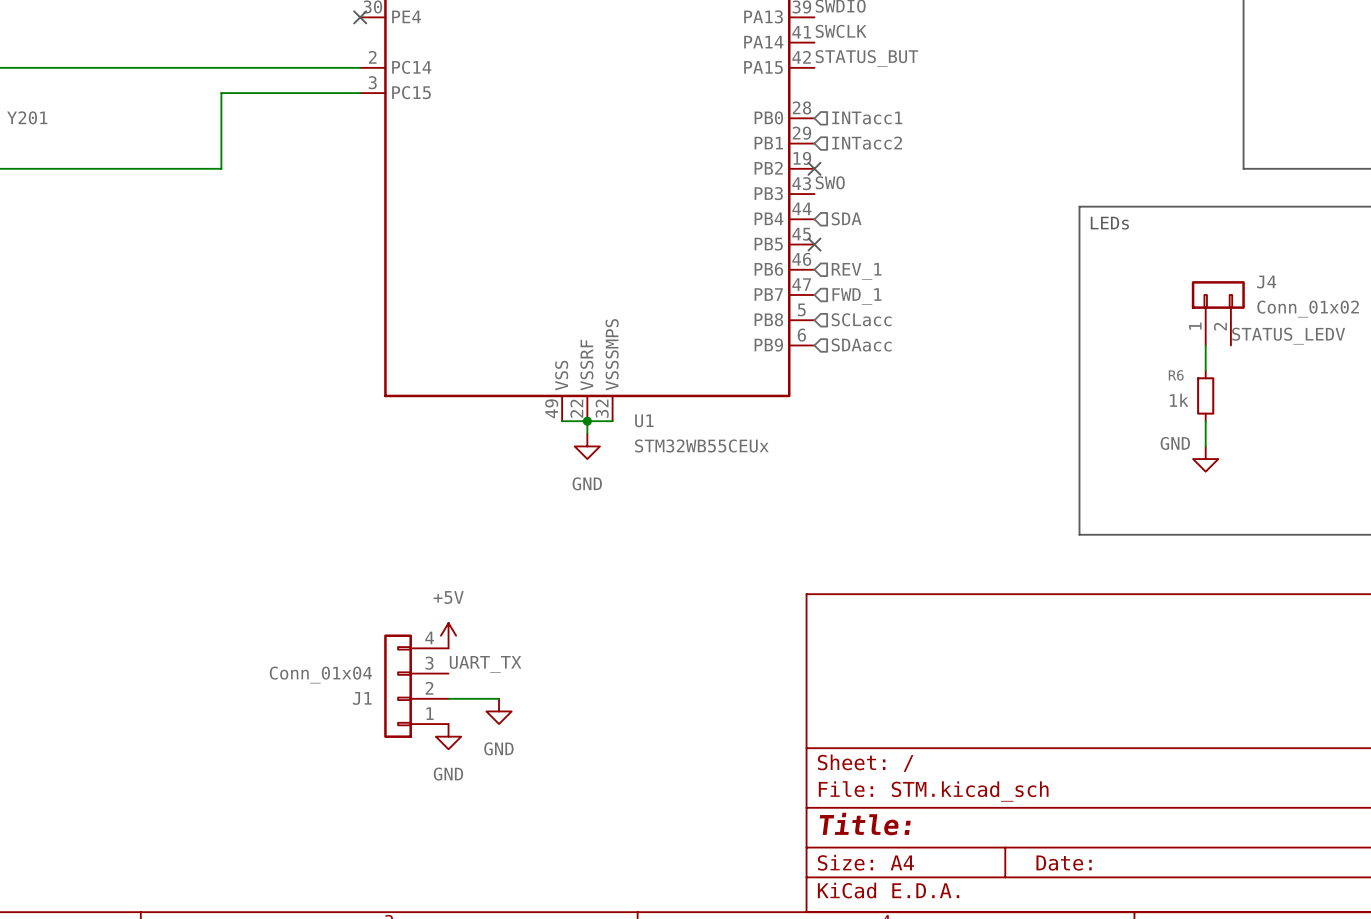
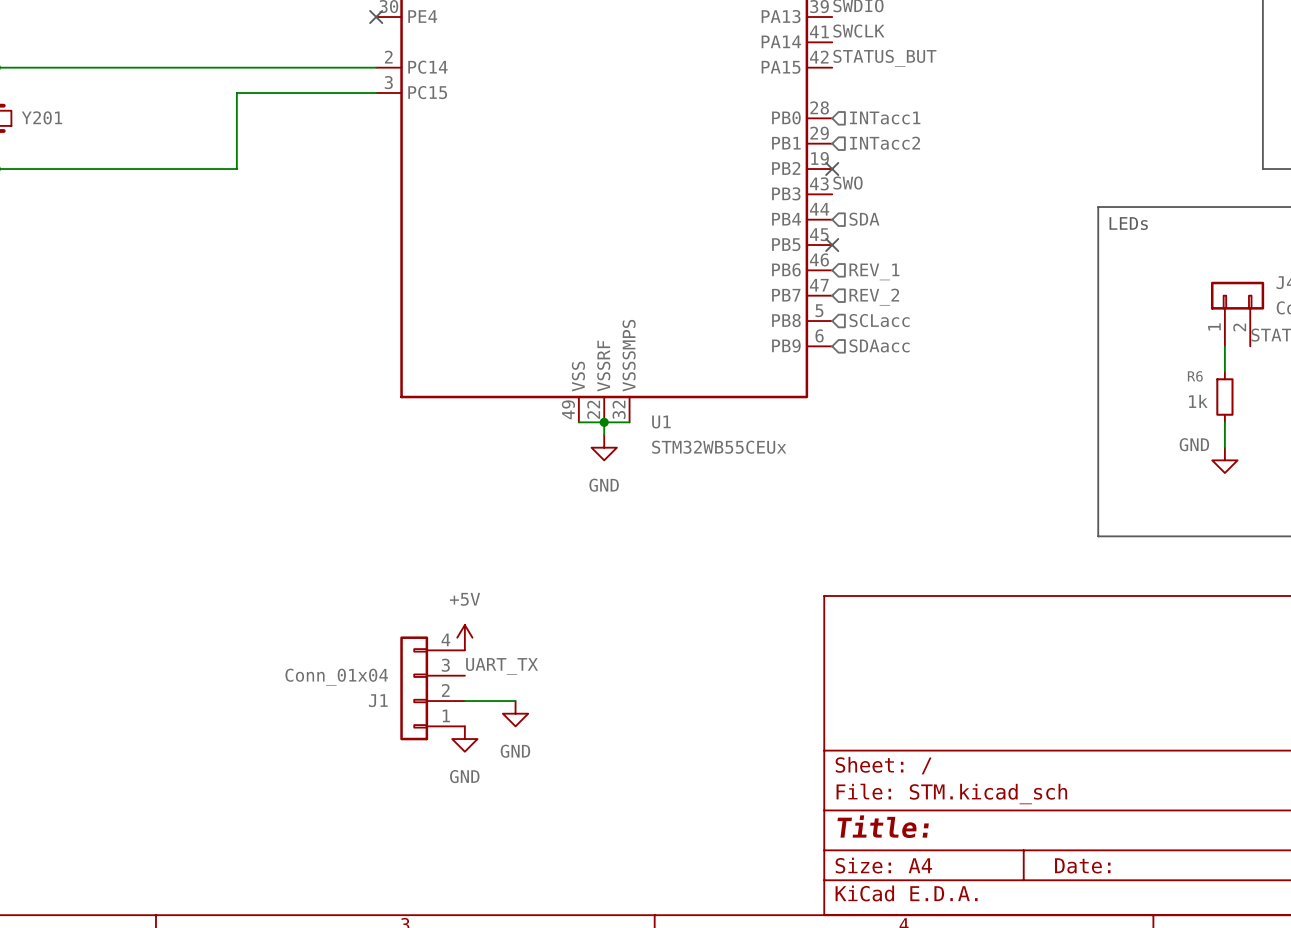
hierarchical label: FWD_1 (856, 296) -> REV_2 (874, 297)

